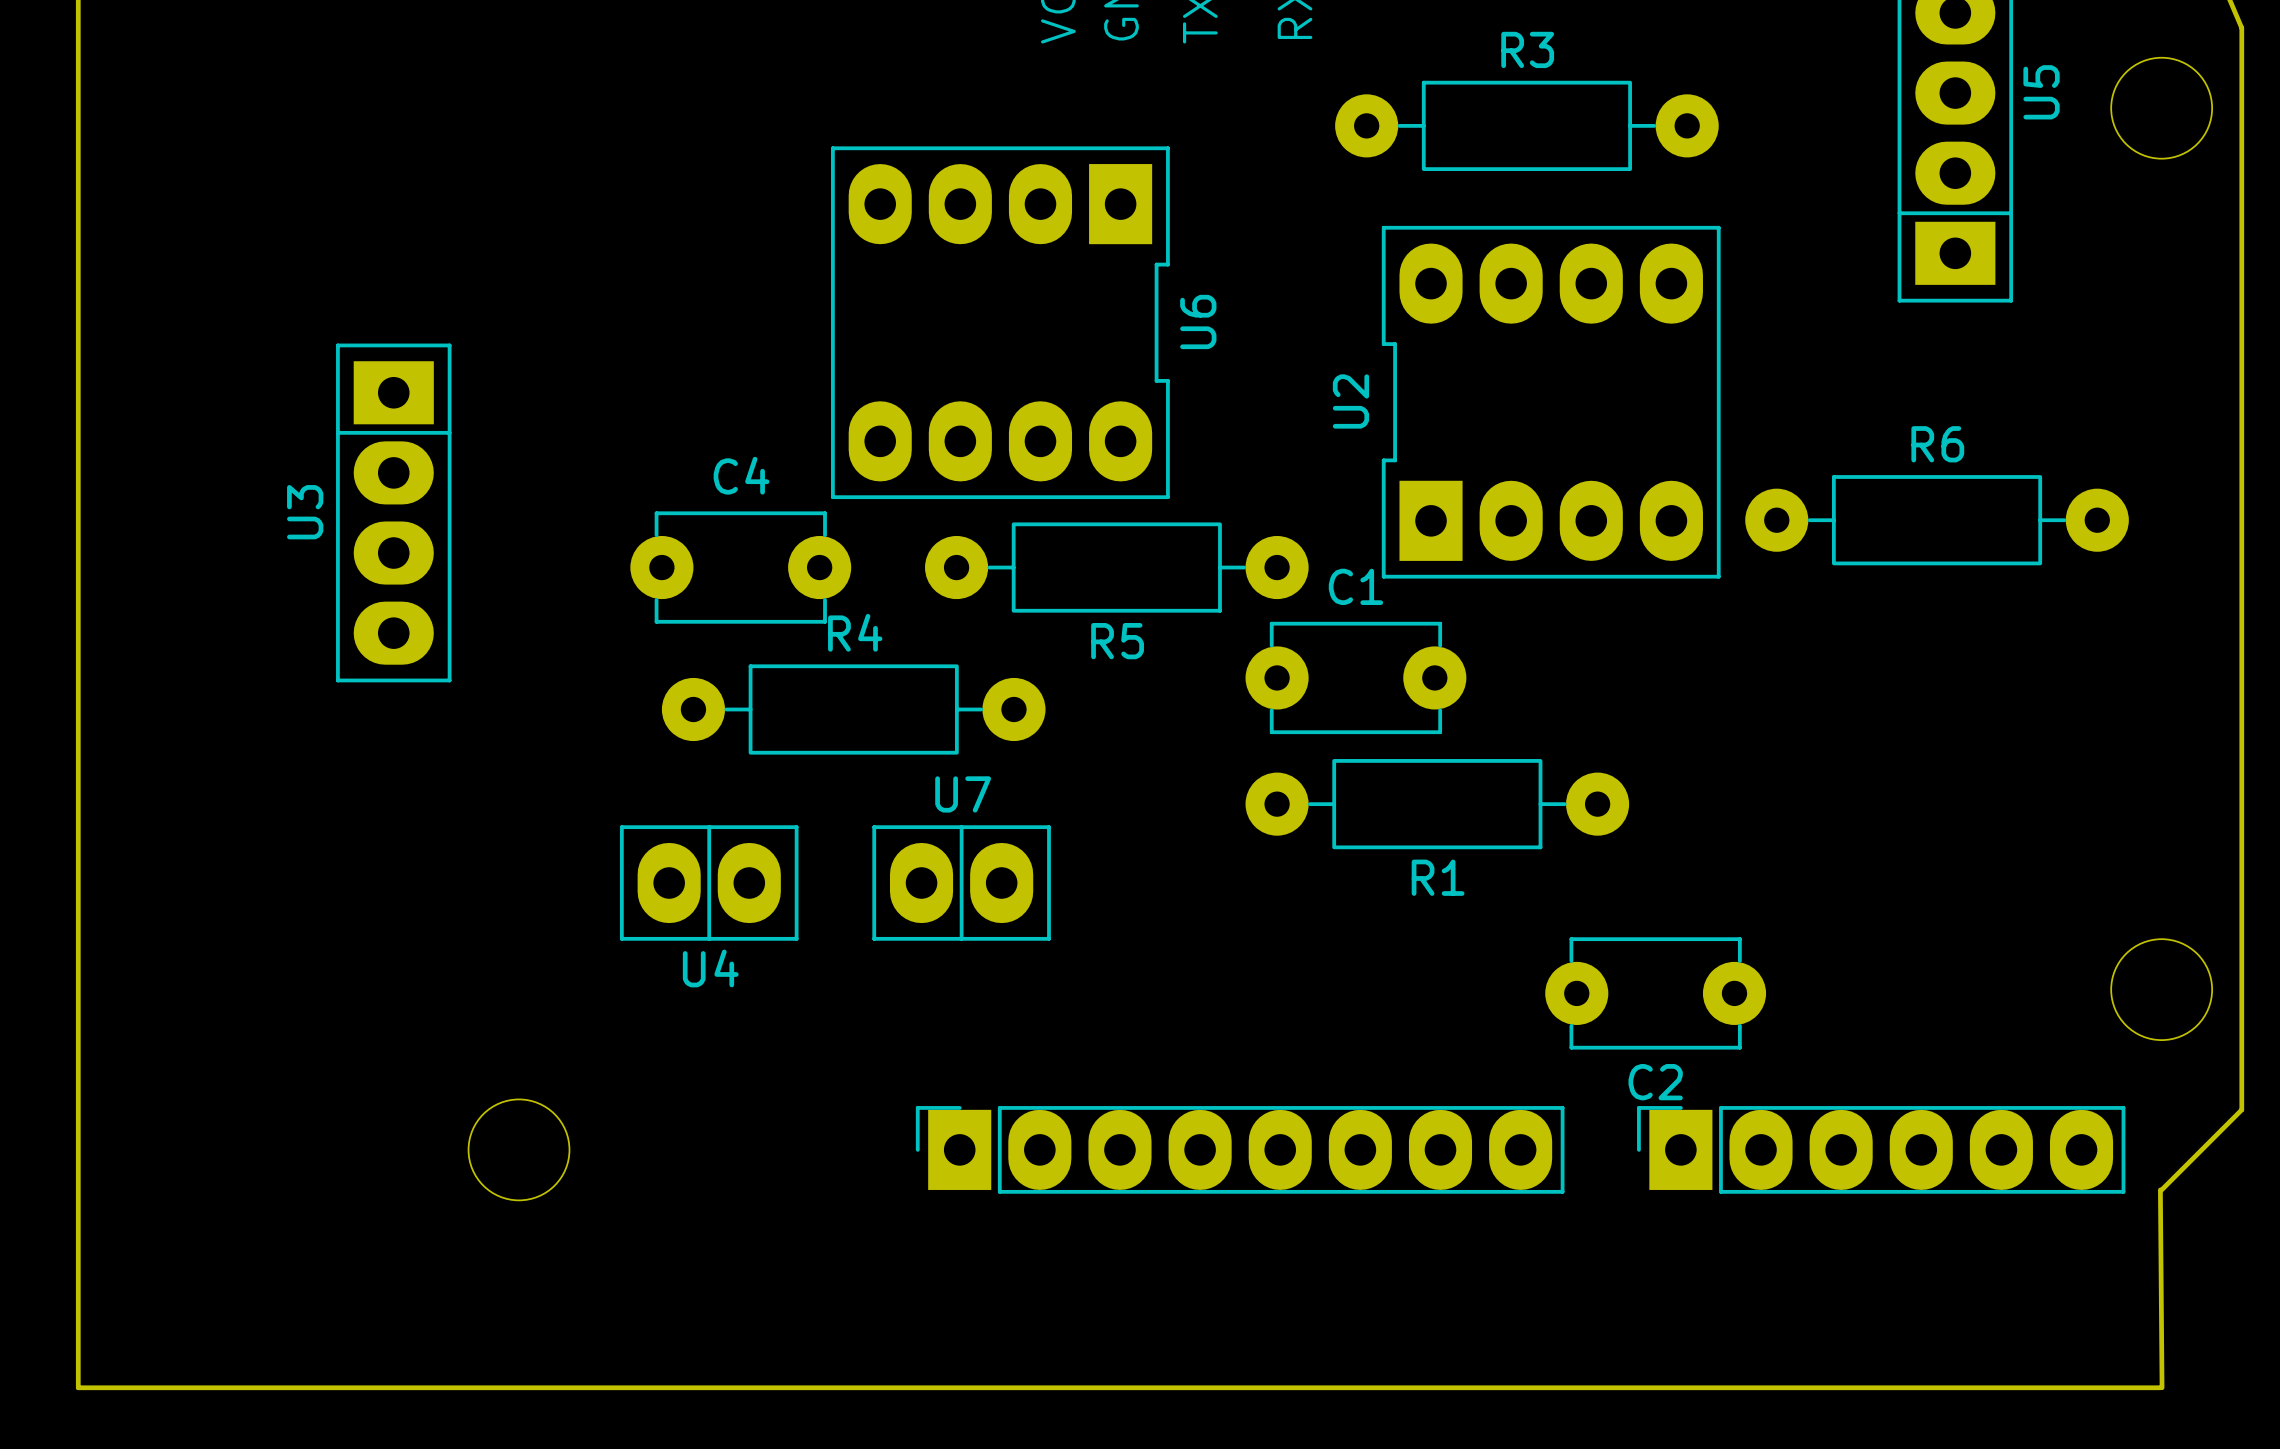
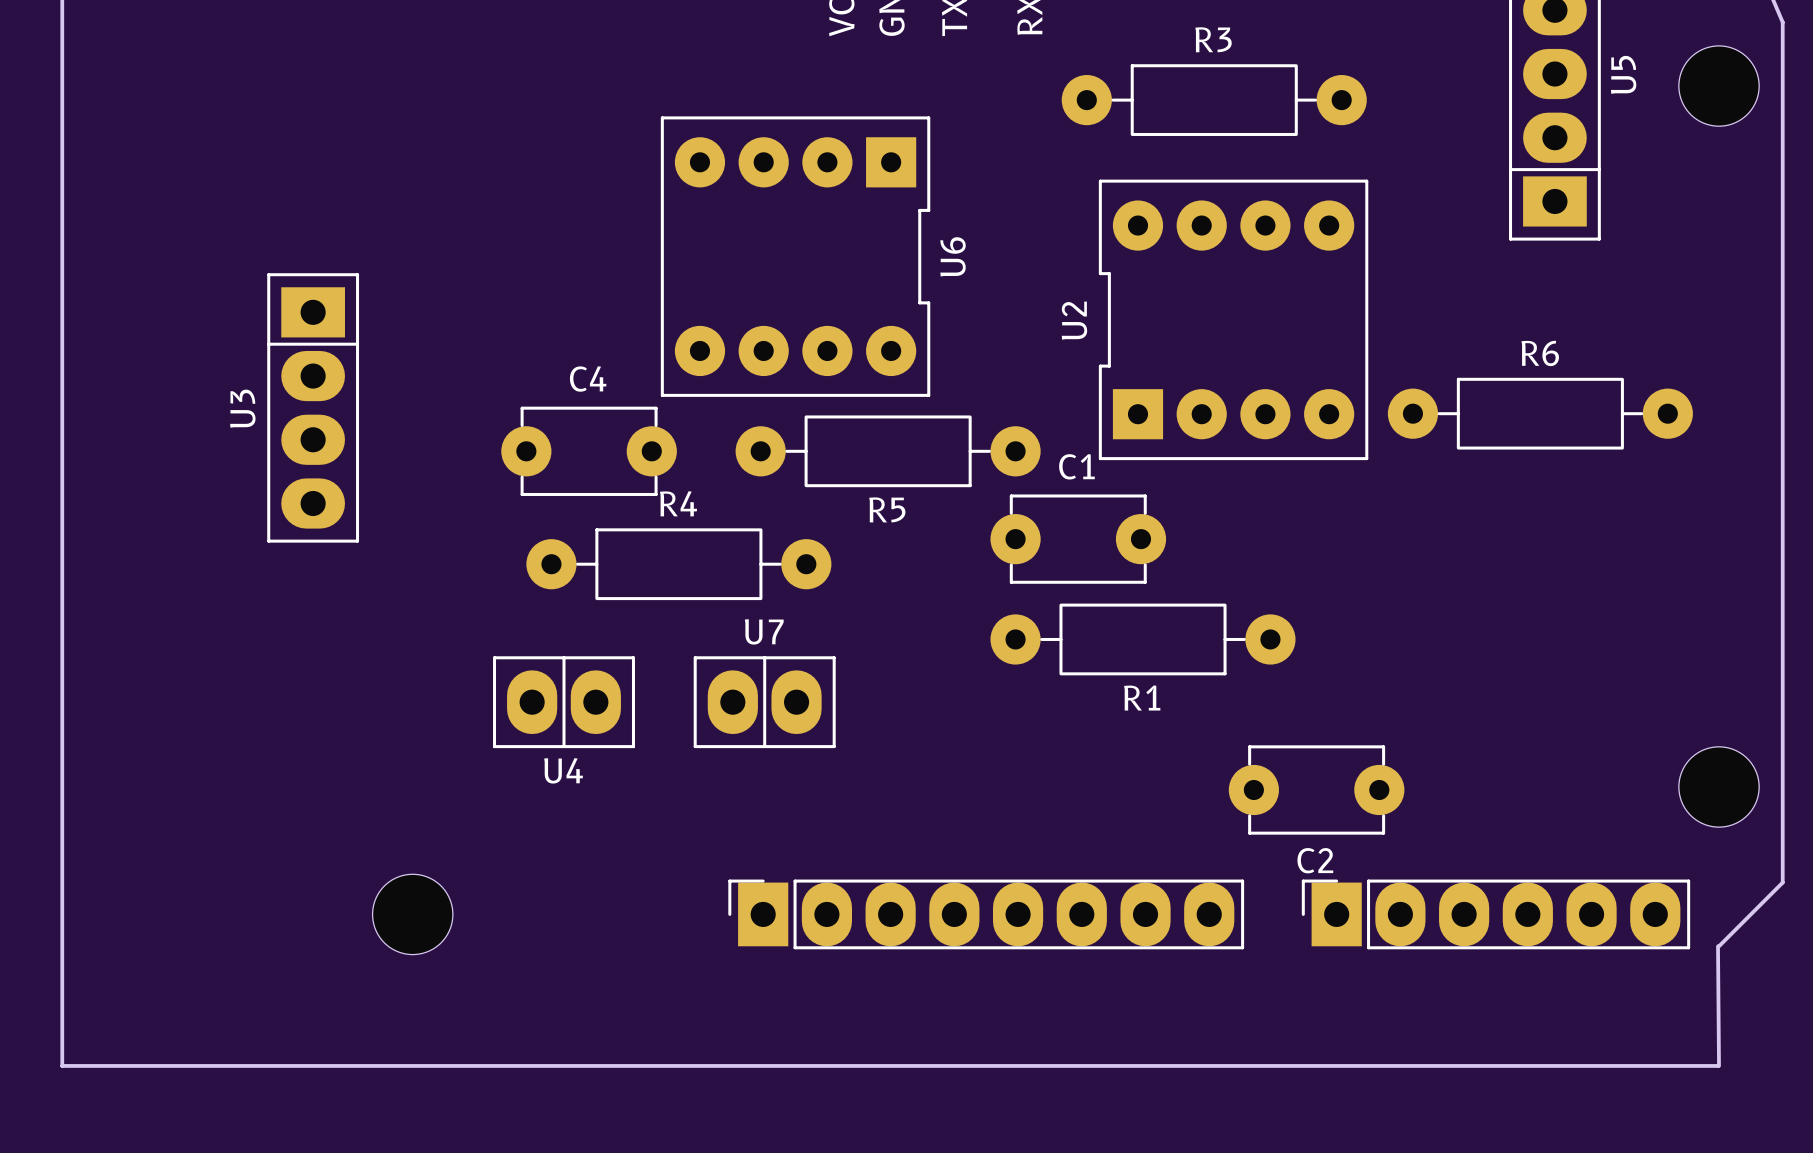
U6 footprint: [831, 146, 1170, 500] -> [660, 116, 931, 397]
U2 footprint: [1381, 225, 1721, 579] -> [1098, 179, 1369, 461]
board edge: (78, 1340) (78, 1387) (2160, 1387) -> (62, 1065) (1718, 1065)
board edge: (2161, 1340) (2162, 1387) -> none

